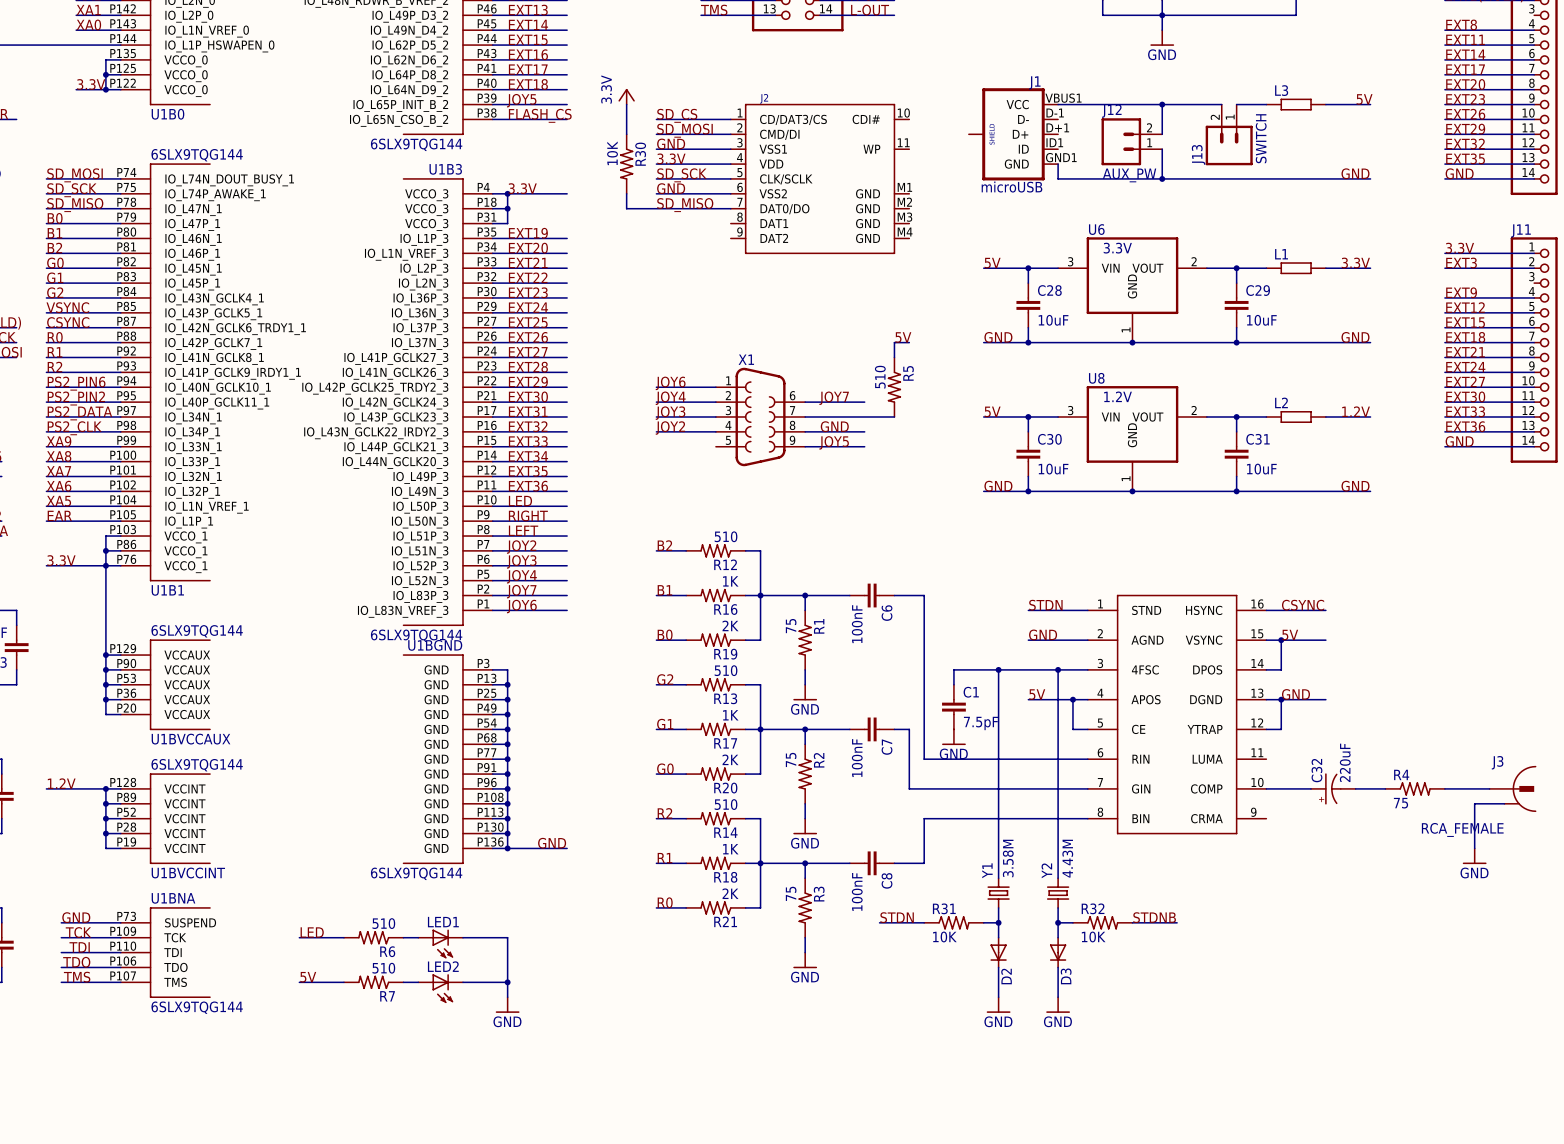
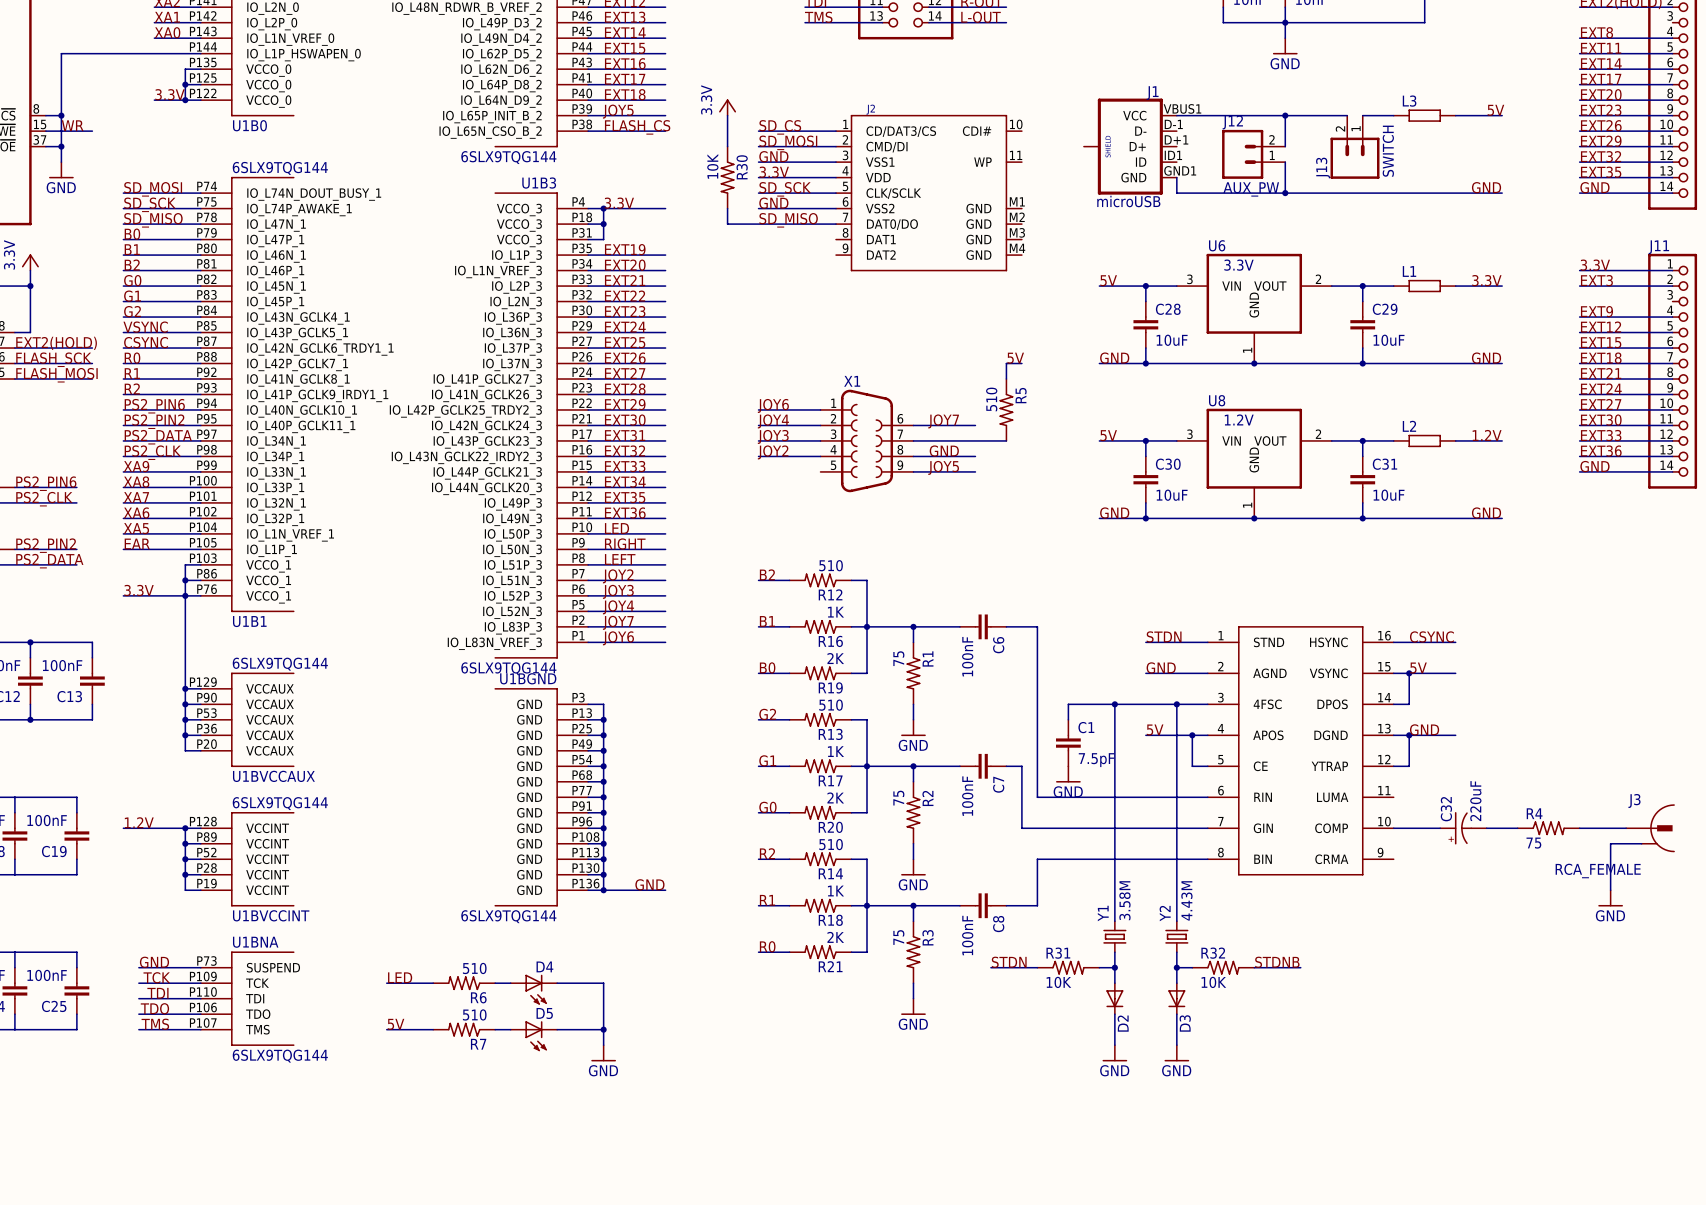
LED1 name: LED1 (443, 922) -> D4 (544, 966)
LED2 name: LED2 (443, 966) -> D5 (544, 1013)

